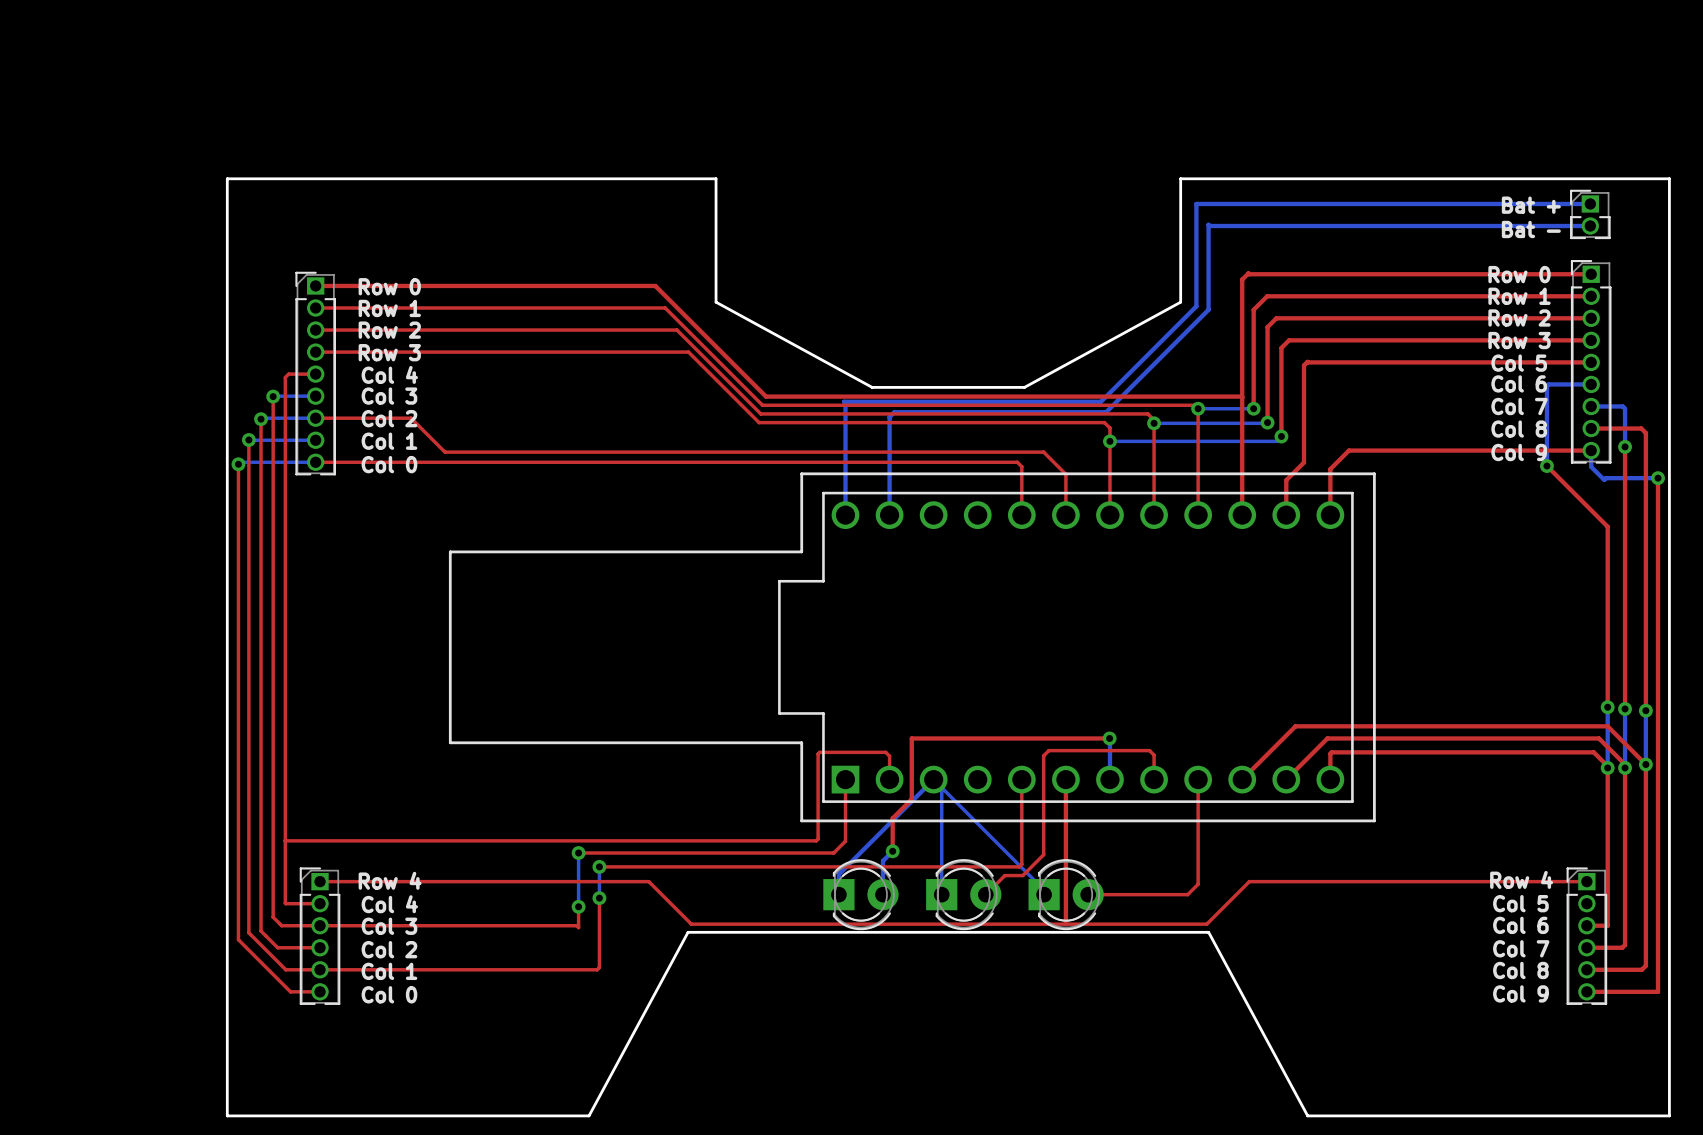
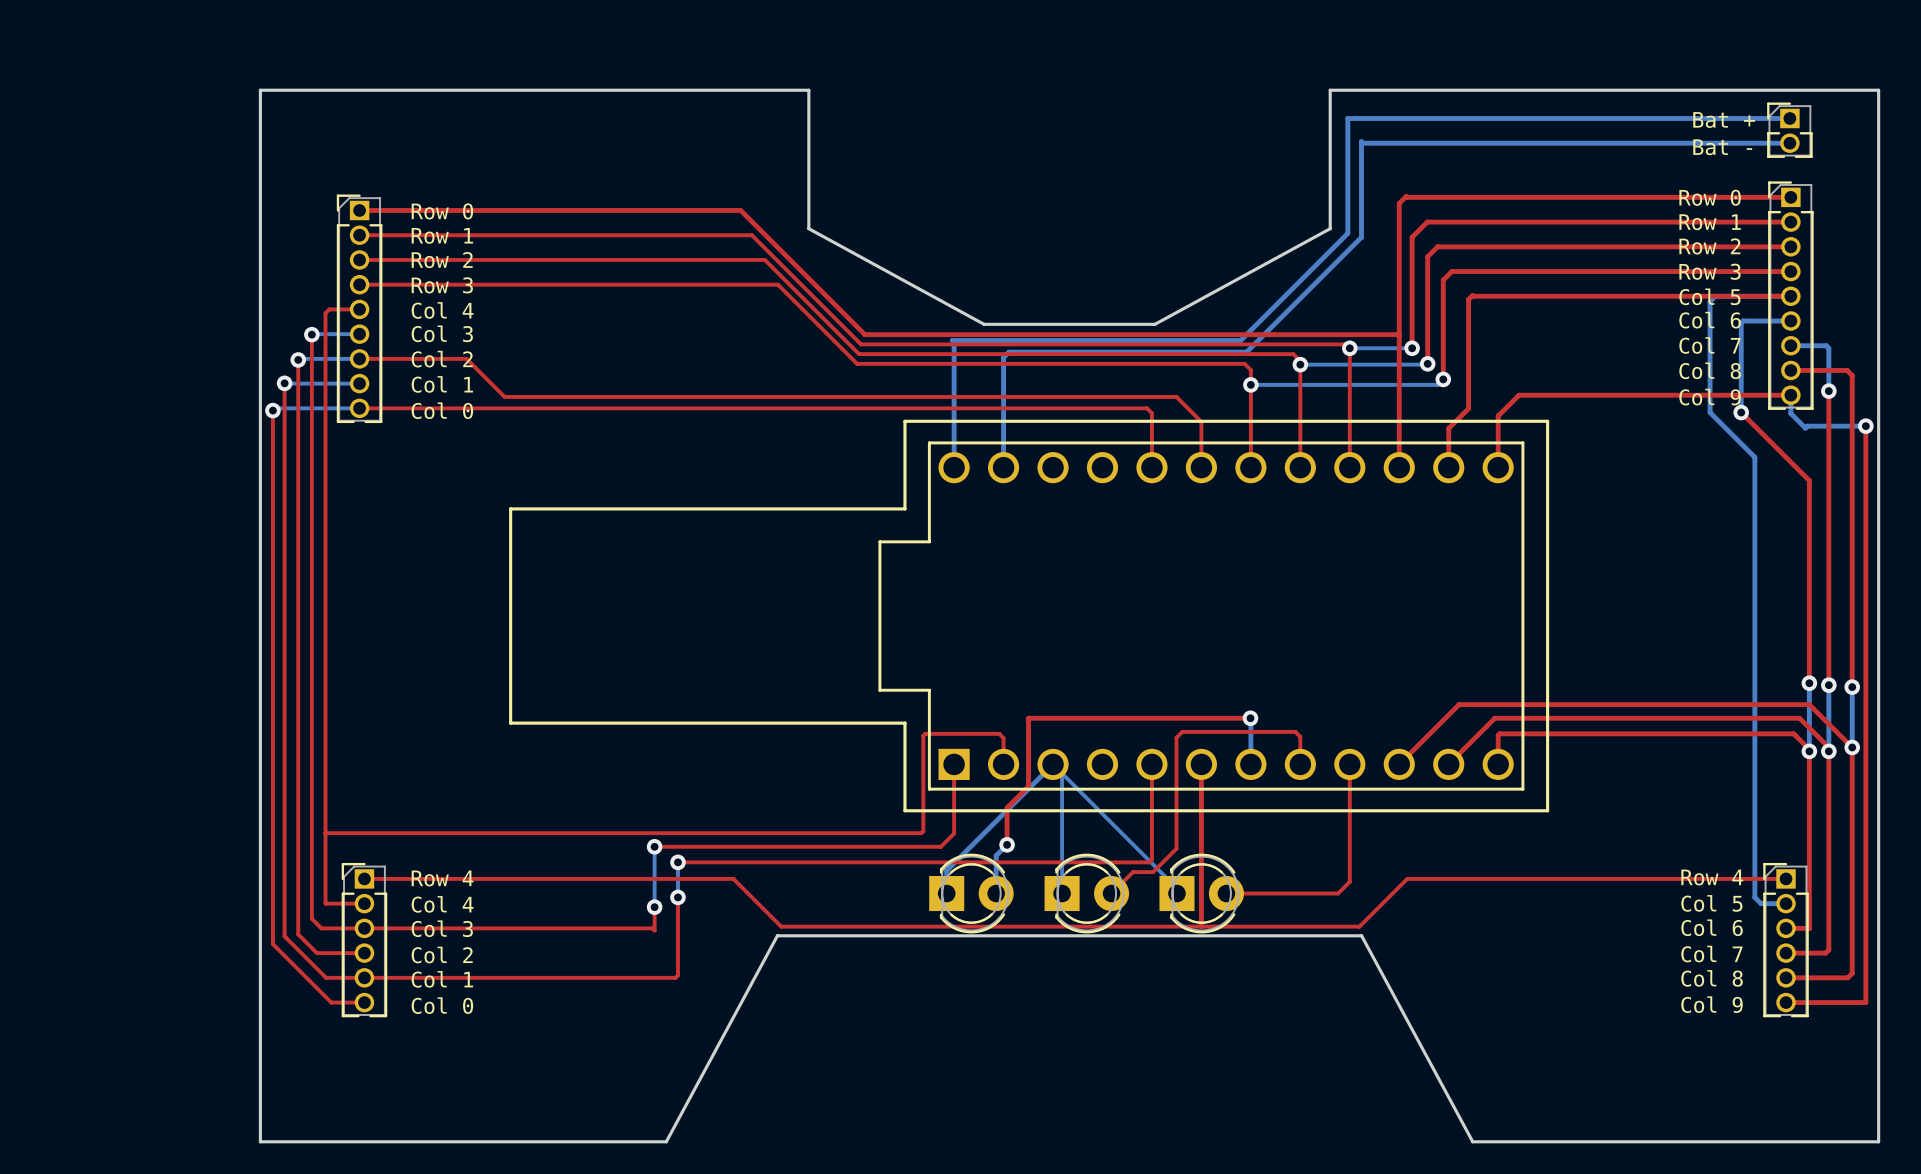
bottom track: none -> (1790, 296) (1715, 296) (1710, 301) (1710, 412) (1754, 457) (1754, 897) (1761, 903) (1786, 903)

